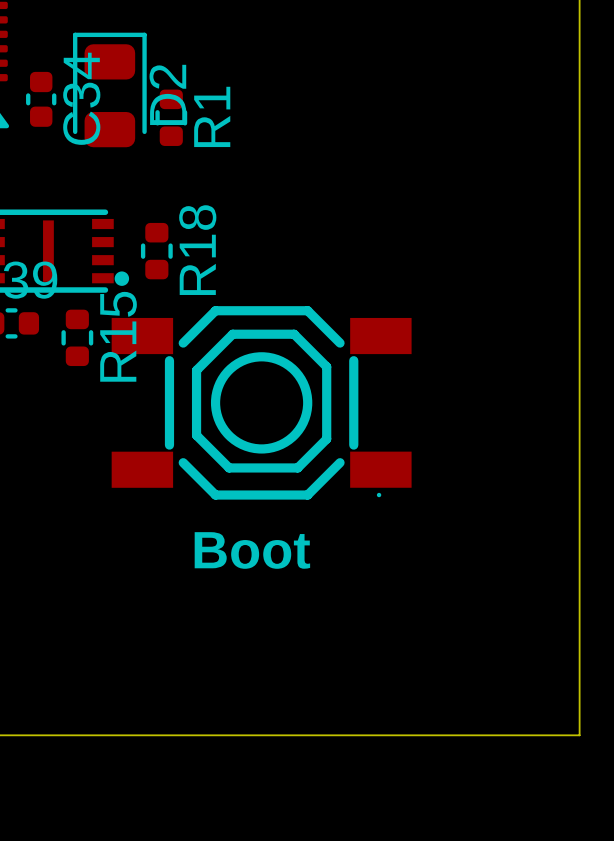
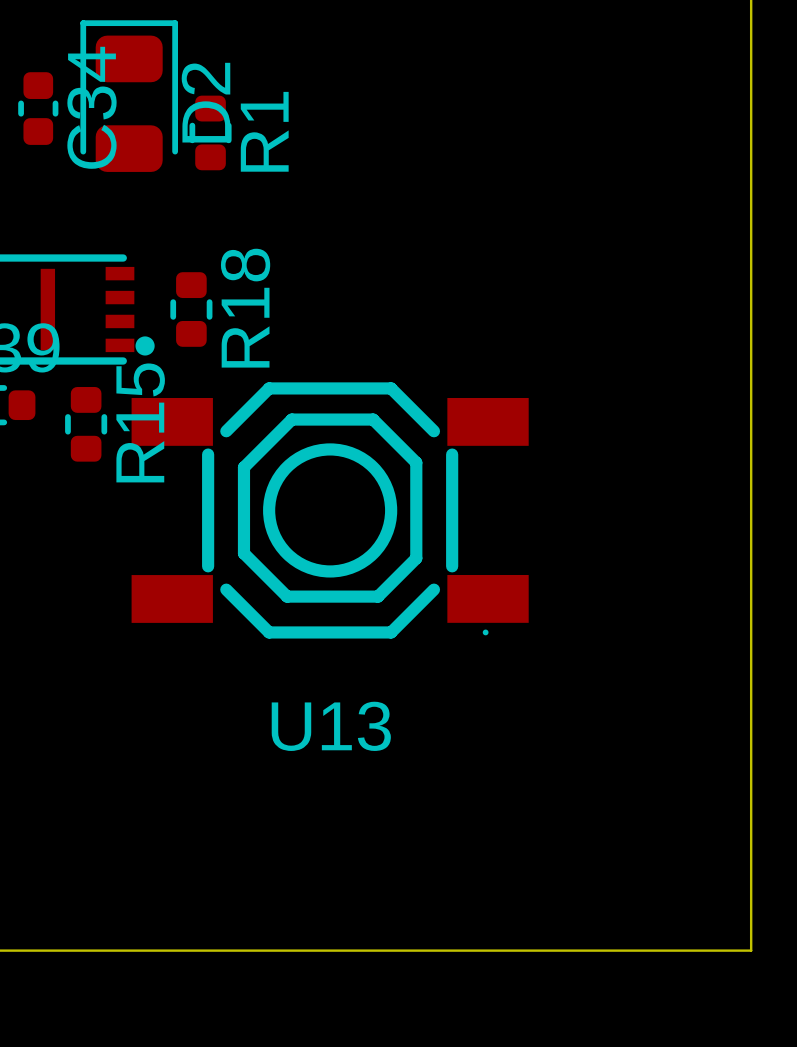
text: Boot (252, 550) -> none
U13 name: none -> U13 (331, 726)

